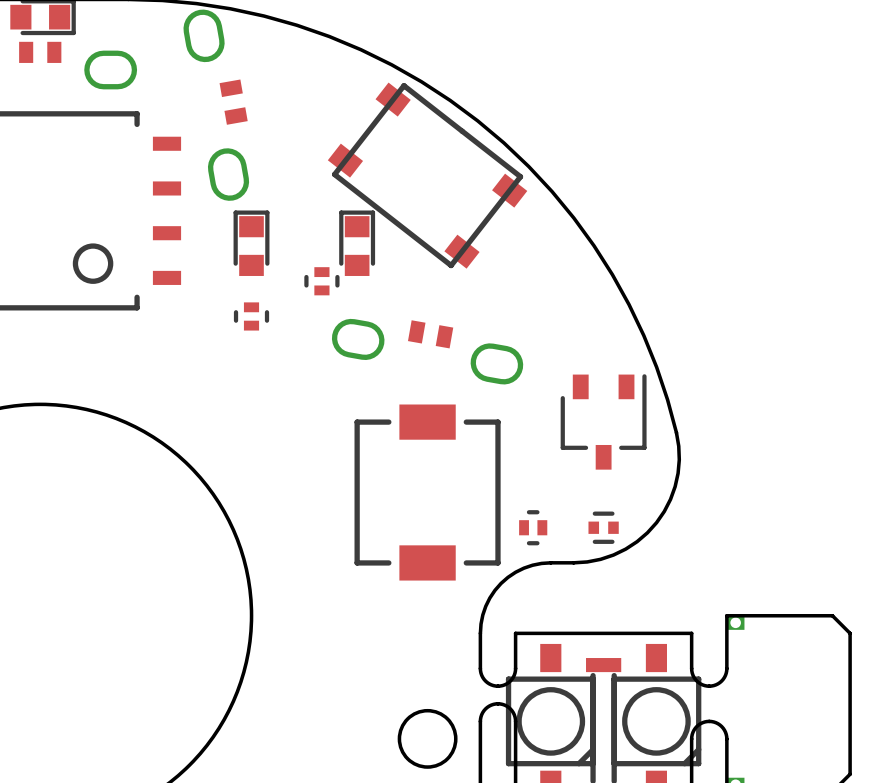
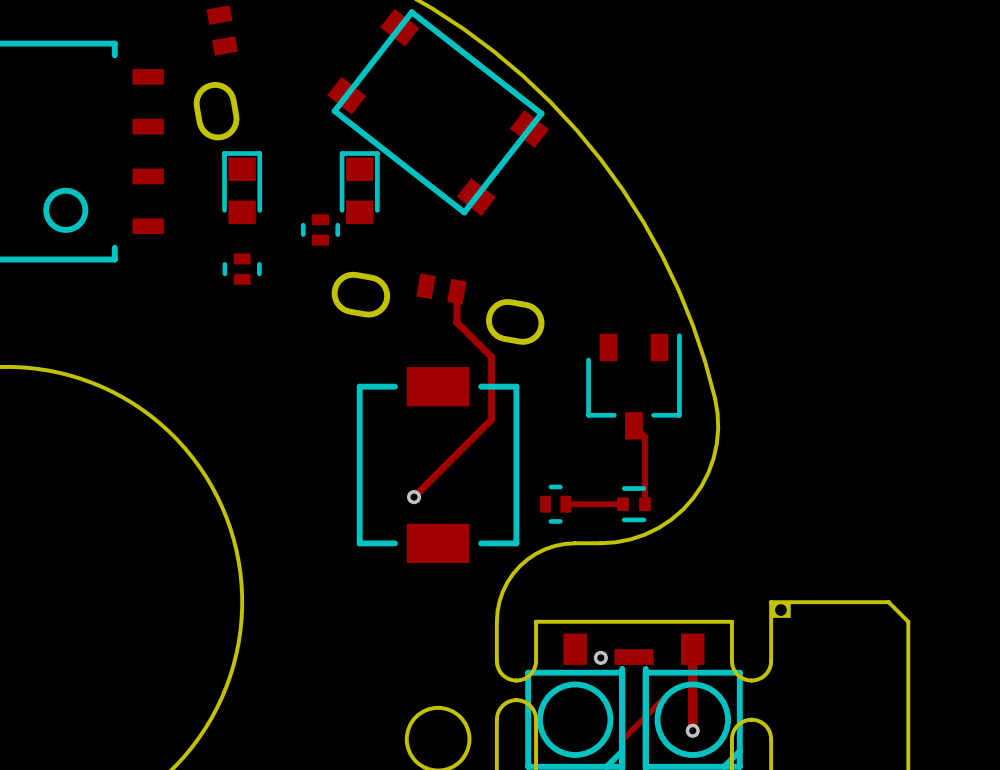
track: none -> (456, 291) (456, 322) (491, 357) (491, 419) (414, 497)
track: none -> (633, 425) (644, 436) (644, 504)
via: none -> (414, 497)
track: none -> (565, 504) (623, 504)
track: none -> (692, 649) (692, 730)
via: none -> (600, 657)
track: none -> (663, 698) (621, 741)
via: none -> (692, 730)

